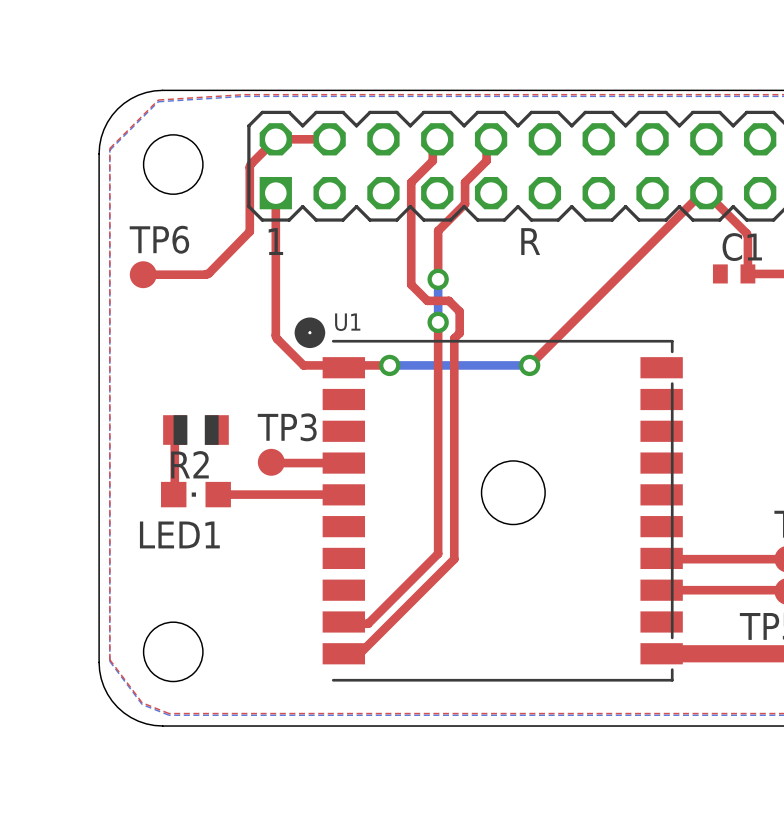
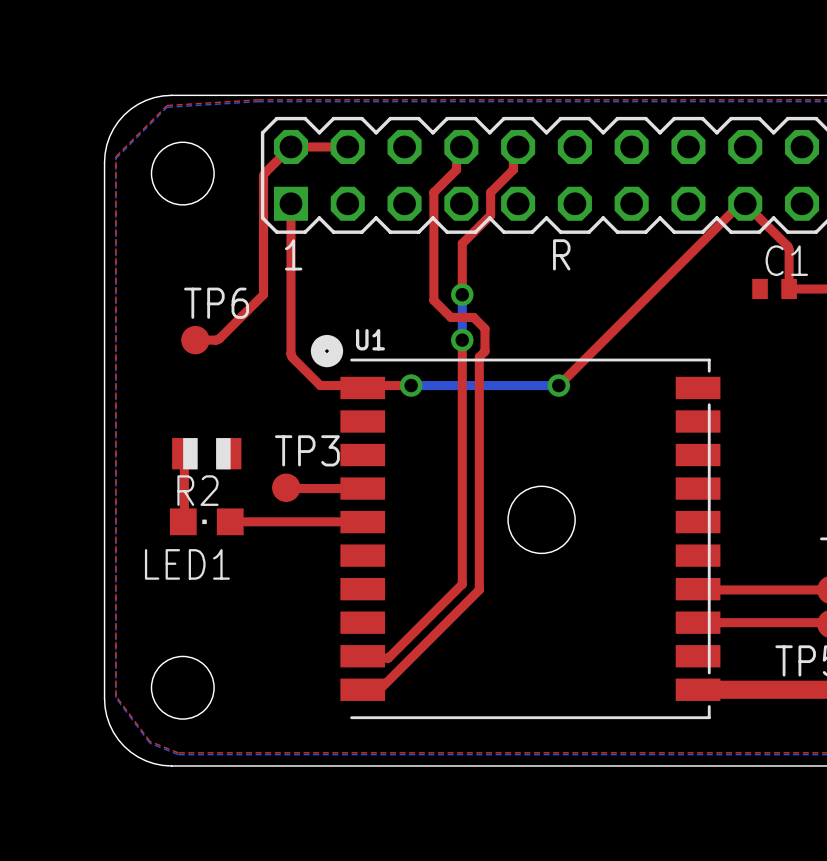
top track: (249, 231) (207, 274) (143, 274) -> (263, 244) (263, 294) (218, 339) (195, 340)
TP6 position: (143, 274) -> (195, 340)

